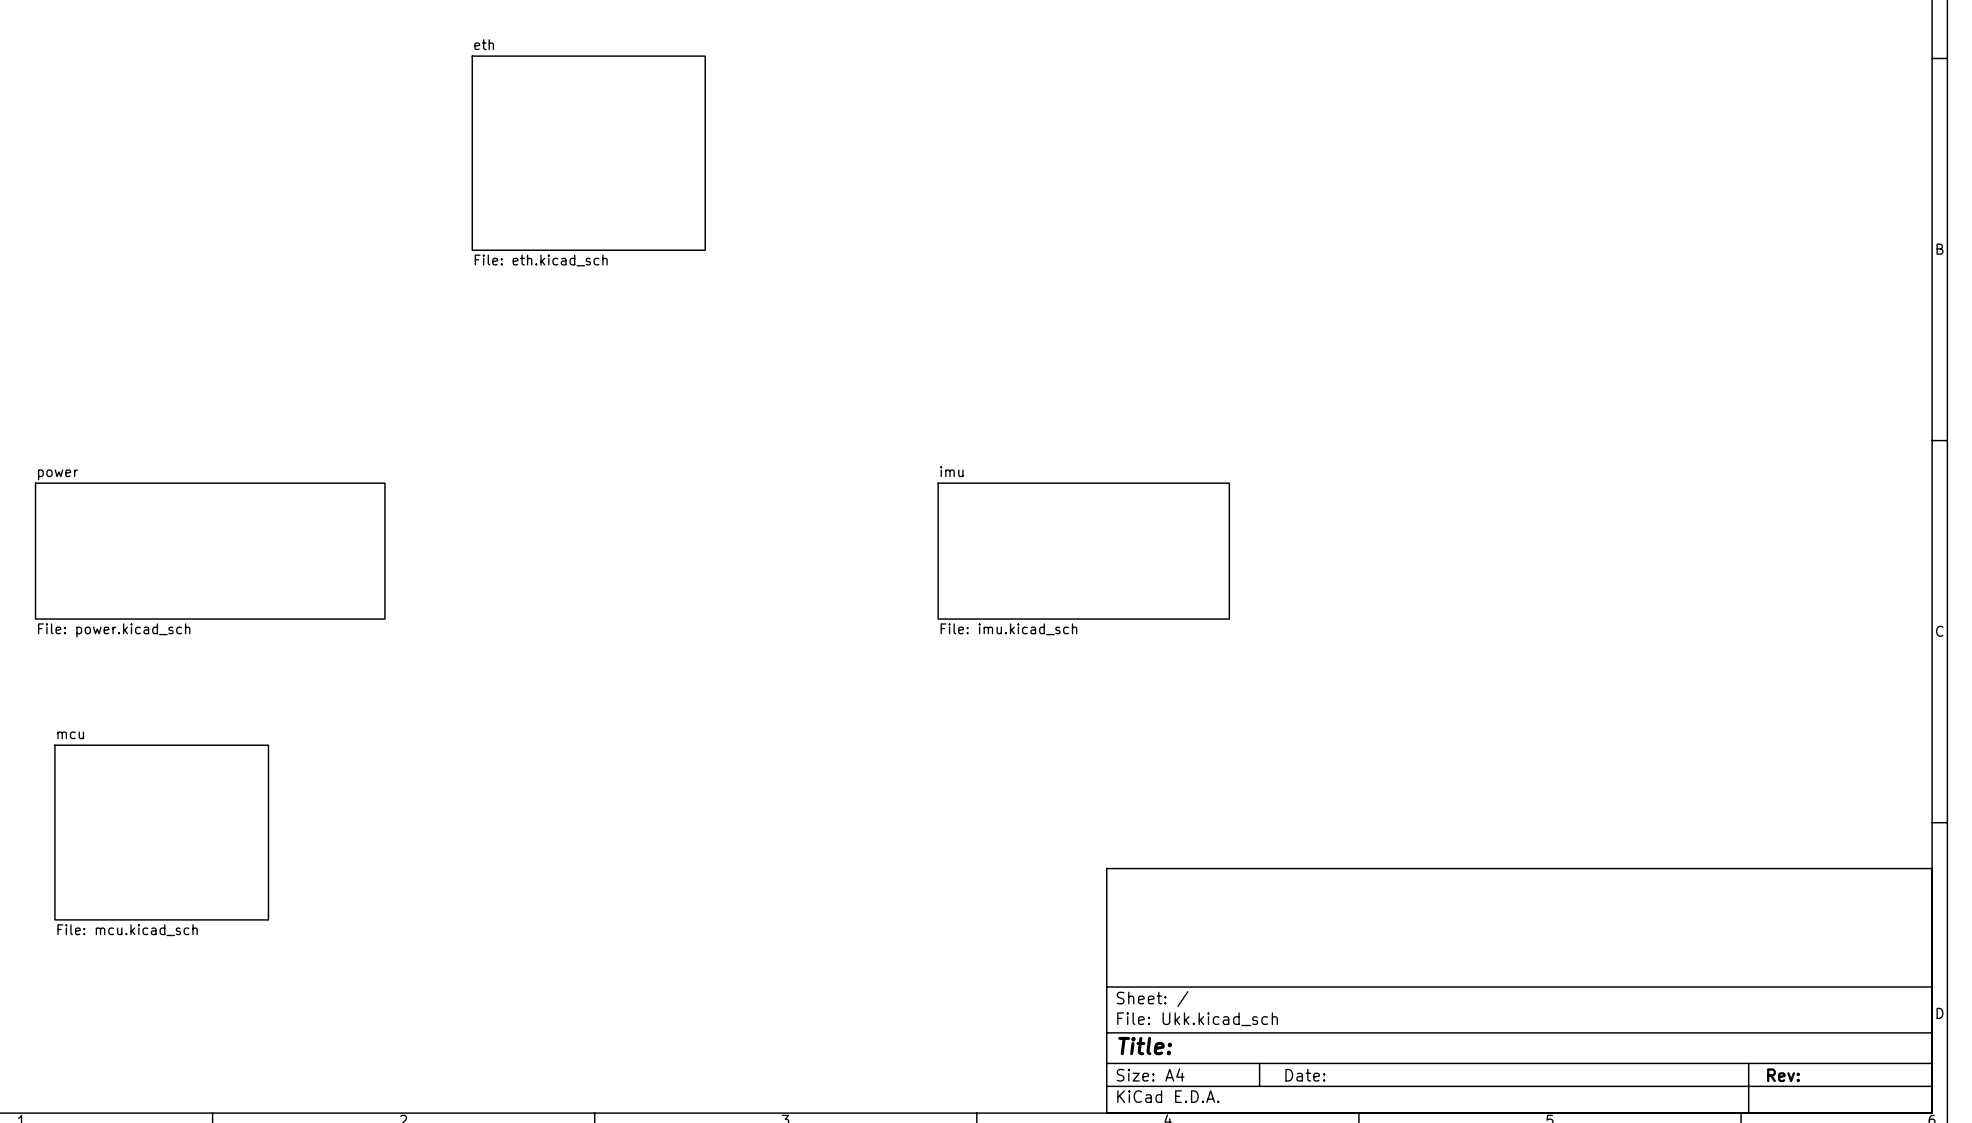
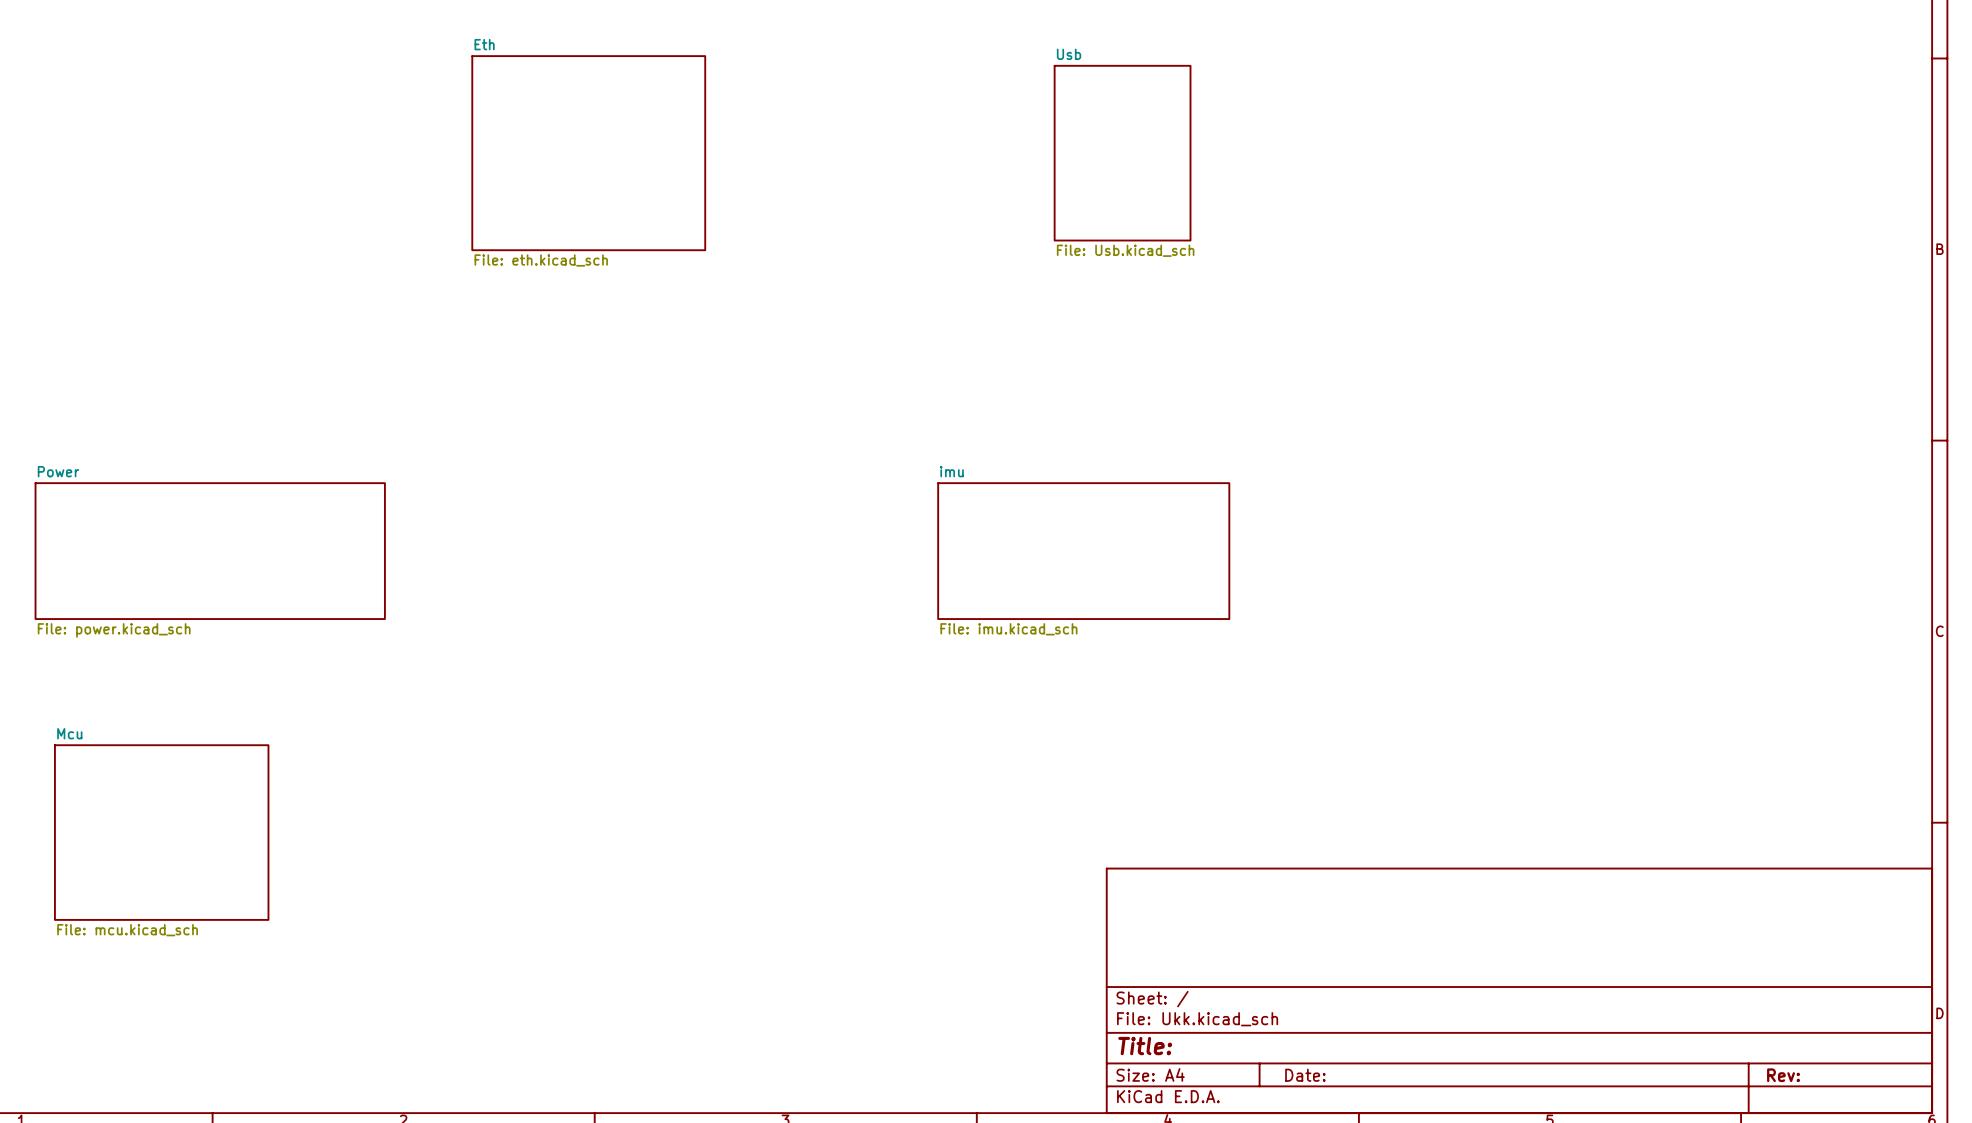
sheet eth name: eth (484, 44) -> Eth (484, 44)
sheet Usb: none -> File: Usb.kicad_sch (1122, 153)
sheet power name: power (58, 474) -> Power (58, 471)
sheet mcu name: mcu (70, 735) -> Mcu (69, 733)

